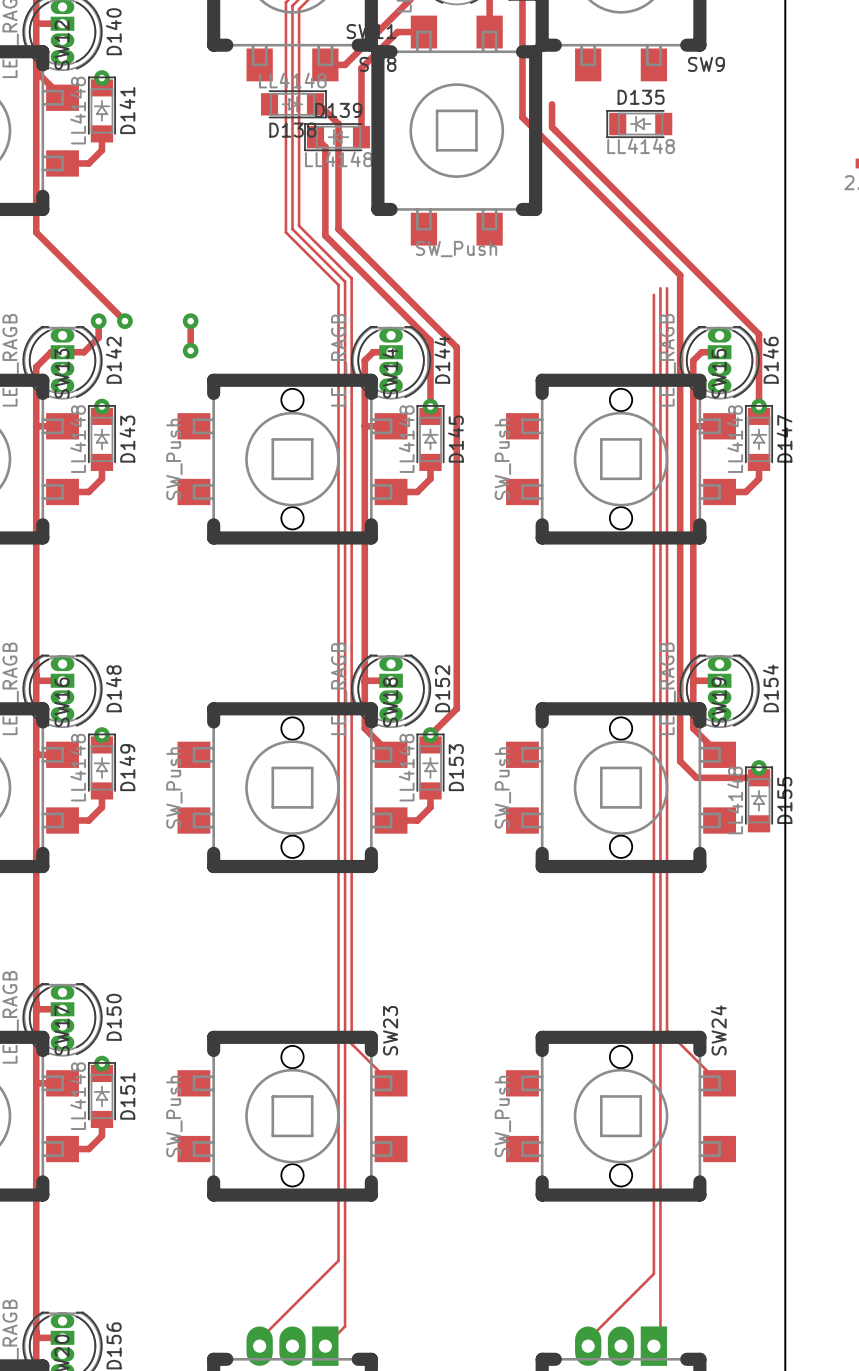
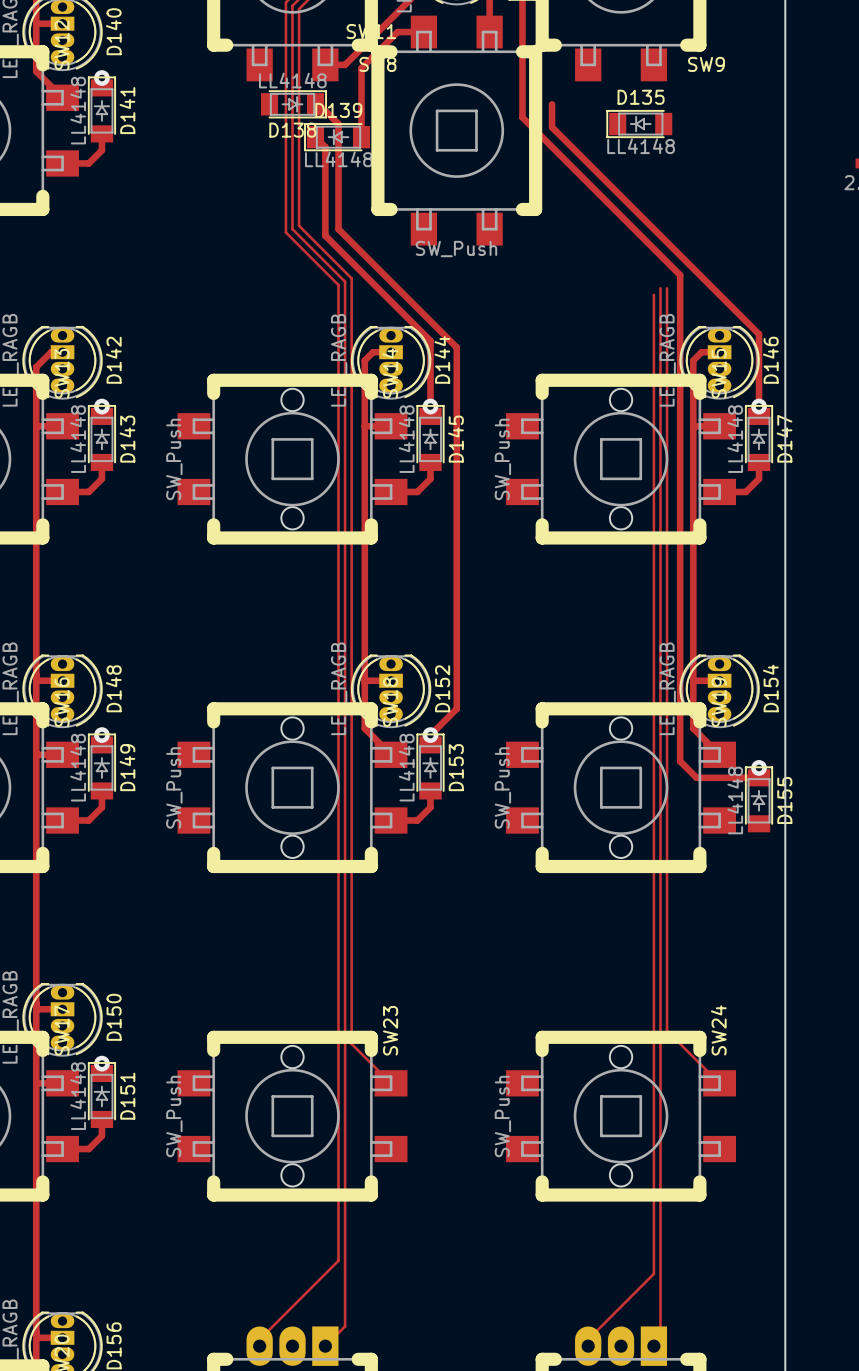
track: (36, 71) (36, 232) (124, 321) -> none
track: (98, 321) (98, 337) (84, 352) (62, 352) -> none
via: (98, 321) -> none
via: (124, 321) -> none
track: (190, 321) (190, 350) -> none
via: (190, 321) -> none
via: (190, 350) -> none

